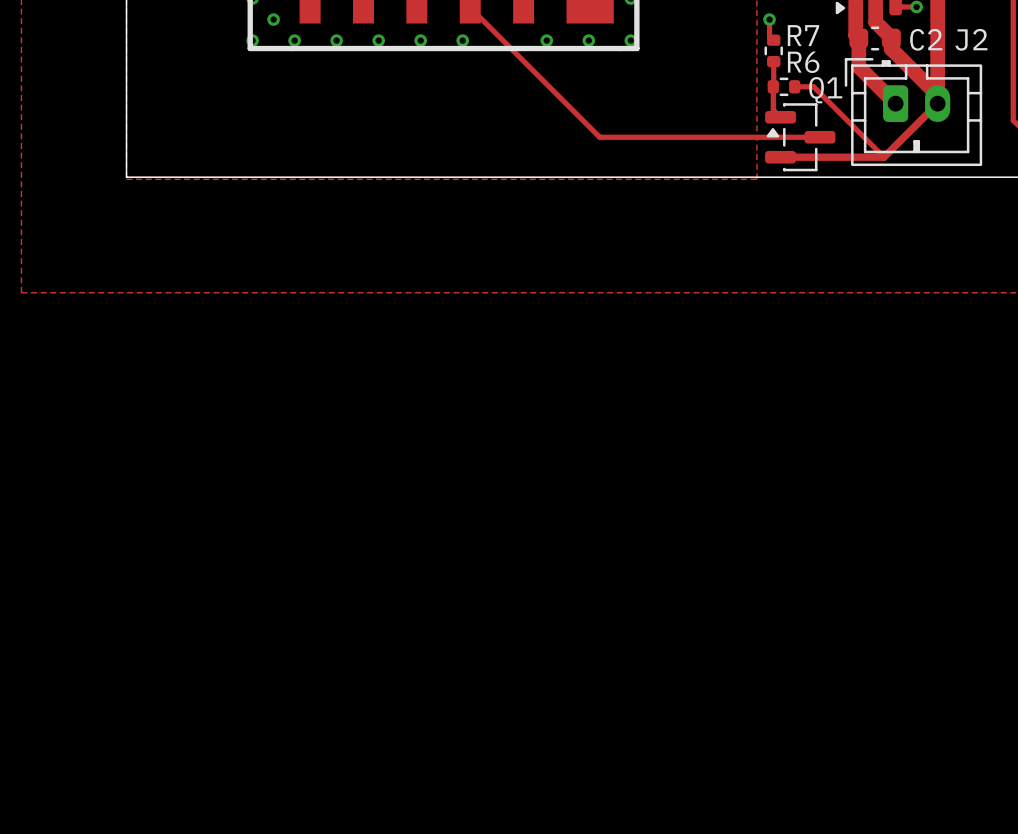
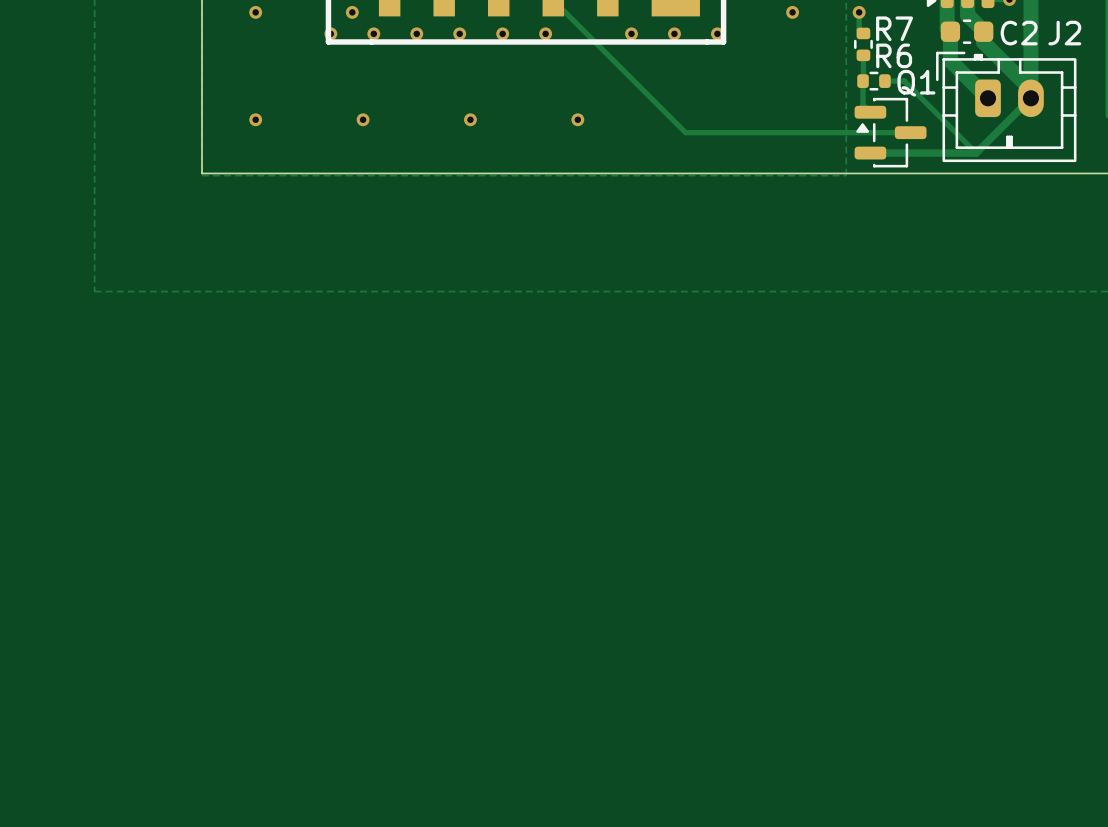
via: none -> (255, 12)
via: none -> (792, 12)
via: none -> (255, 119)
via: none -> (363, 119)
via: none -> (470, 119)
via: none -> (577, 119)

